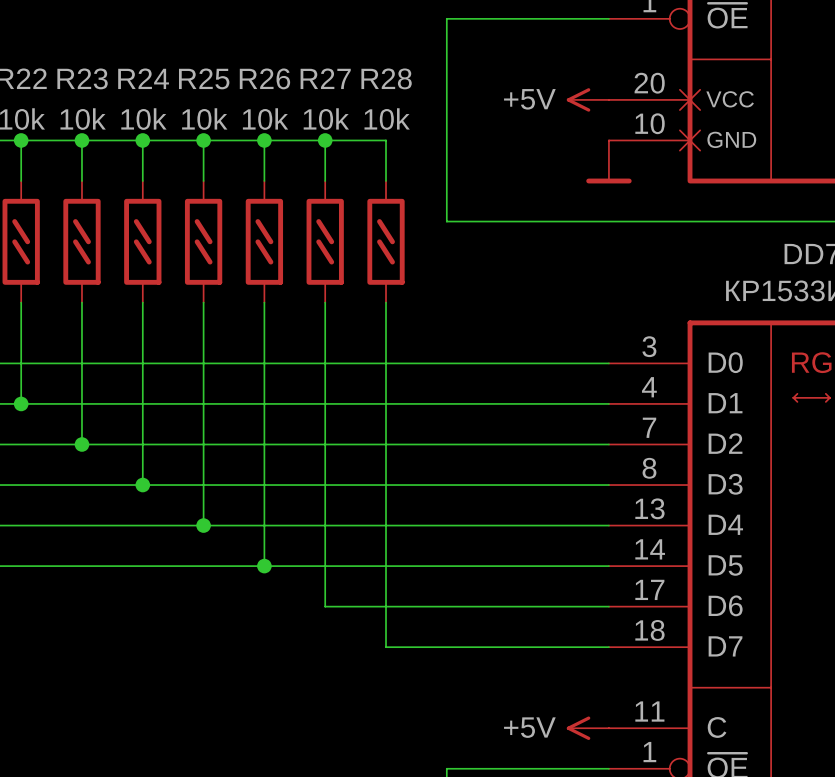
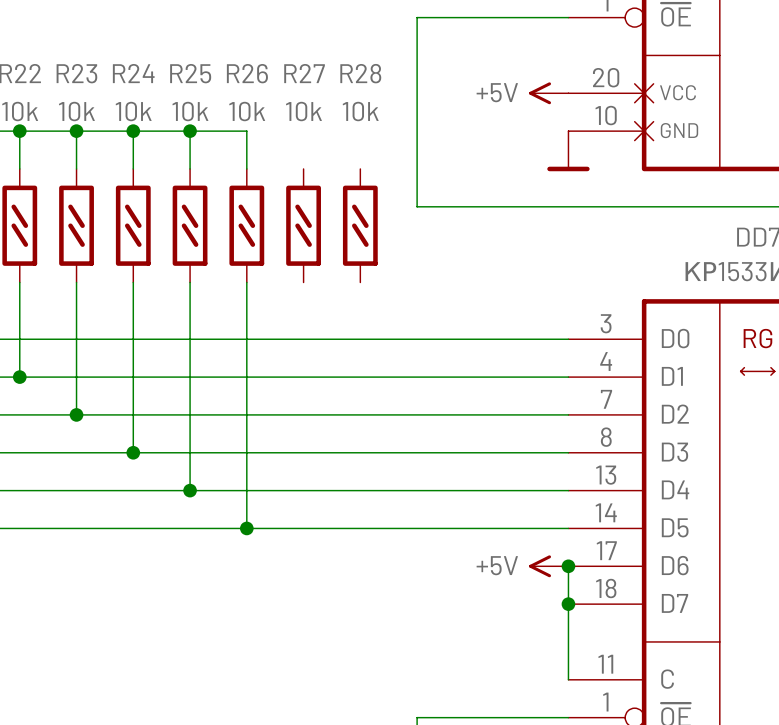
wire: (264, 140) (386, 140) (386, 181) -> none
junction: (264, 140) -> none
wire: (325, 140) (325, 181) -> none
junction: (325, 140) -> none
wire: (325, 302) (325, 606) (608, 606) -> (568, 679) (568, 566)
wire: (386, 302) (386, 647) (608, 647) -> none
junction: none -> (568, 566)
junction: none -> (568, 604)
power symbol position: +5V (587, 728) -> +5V (548, 566)

